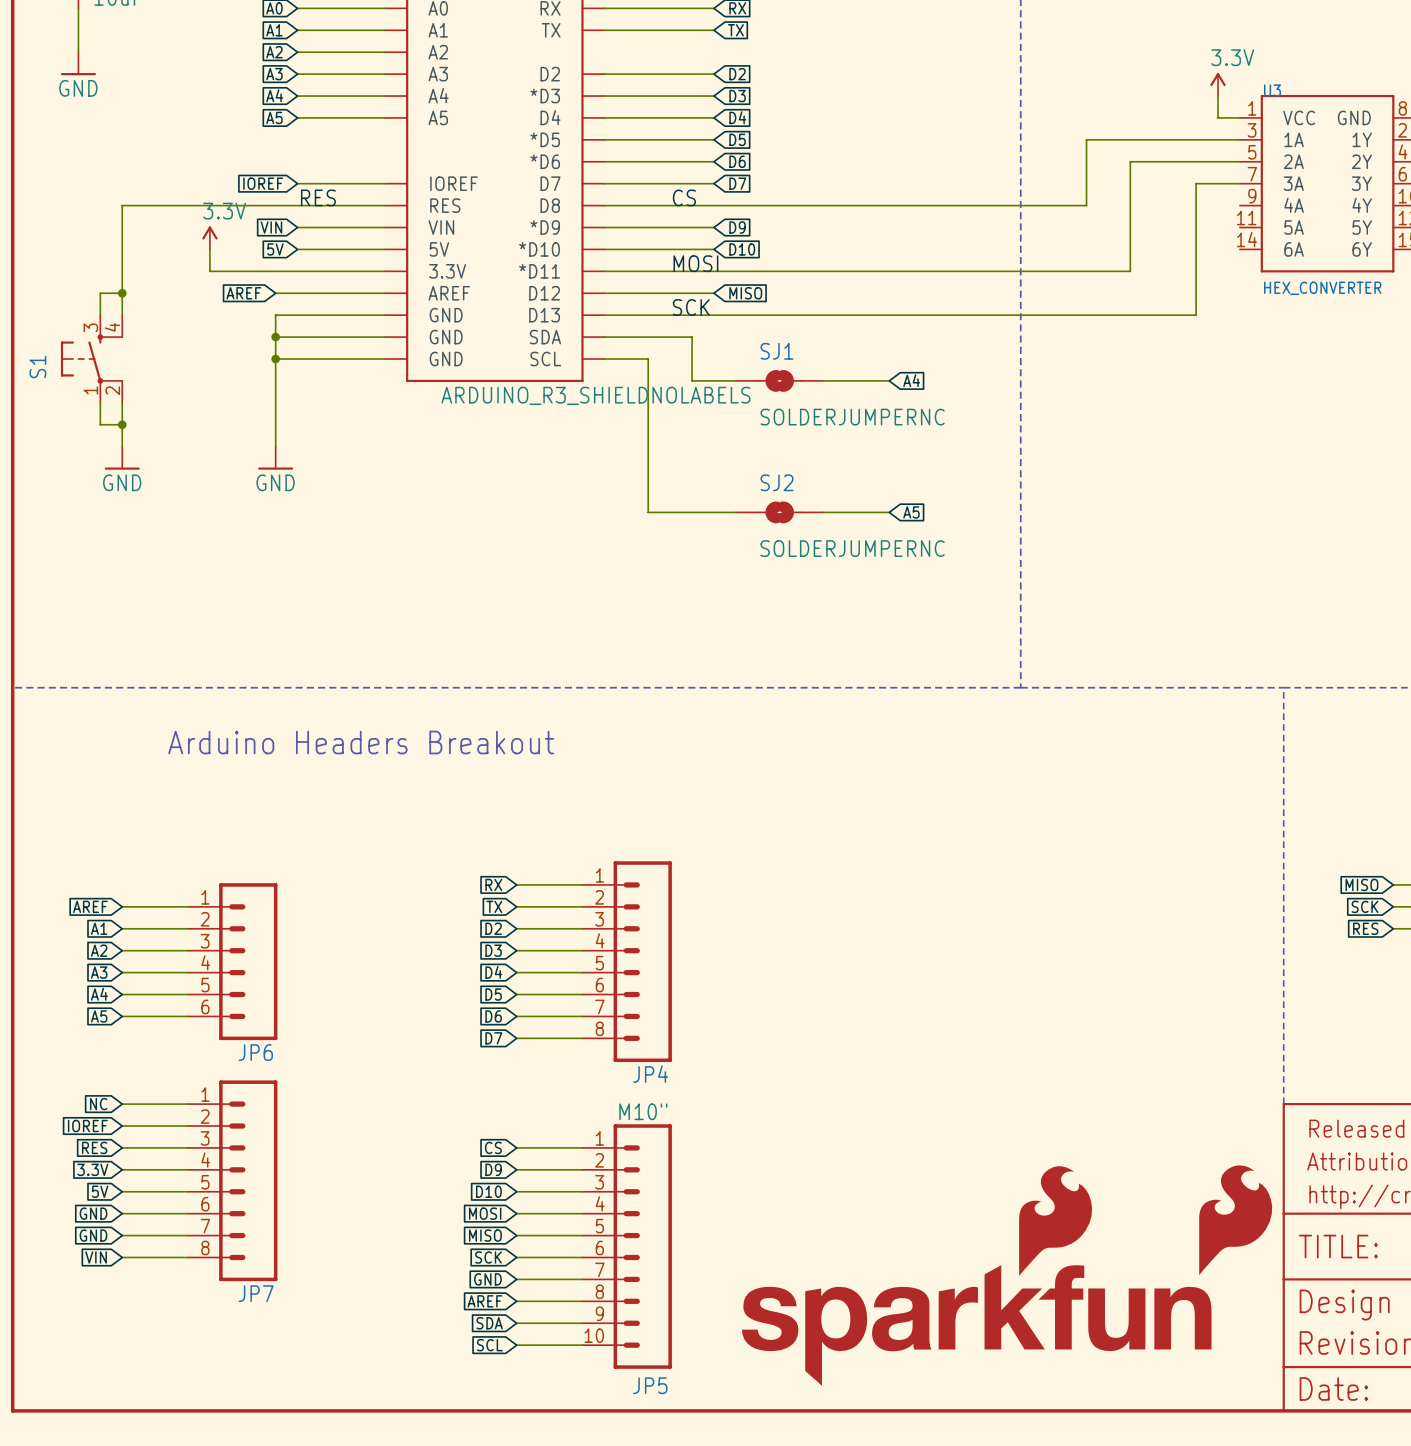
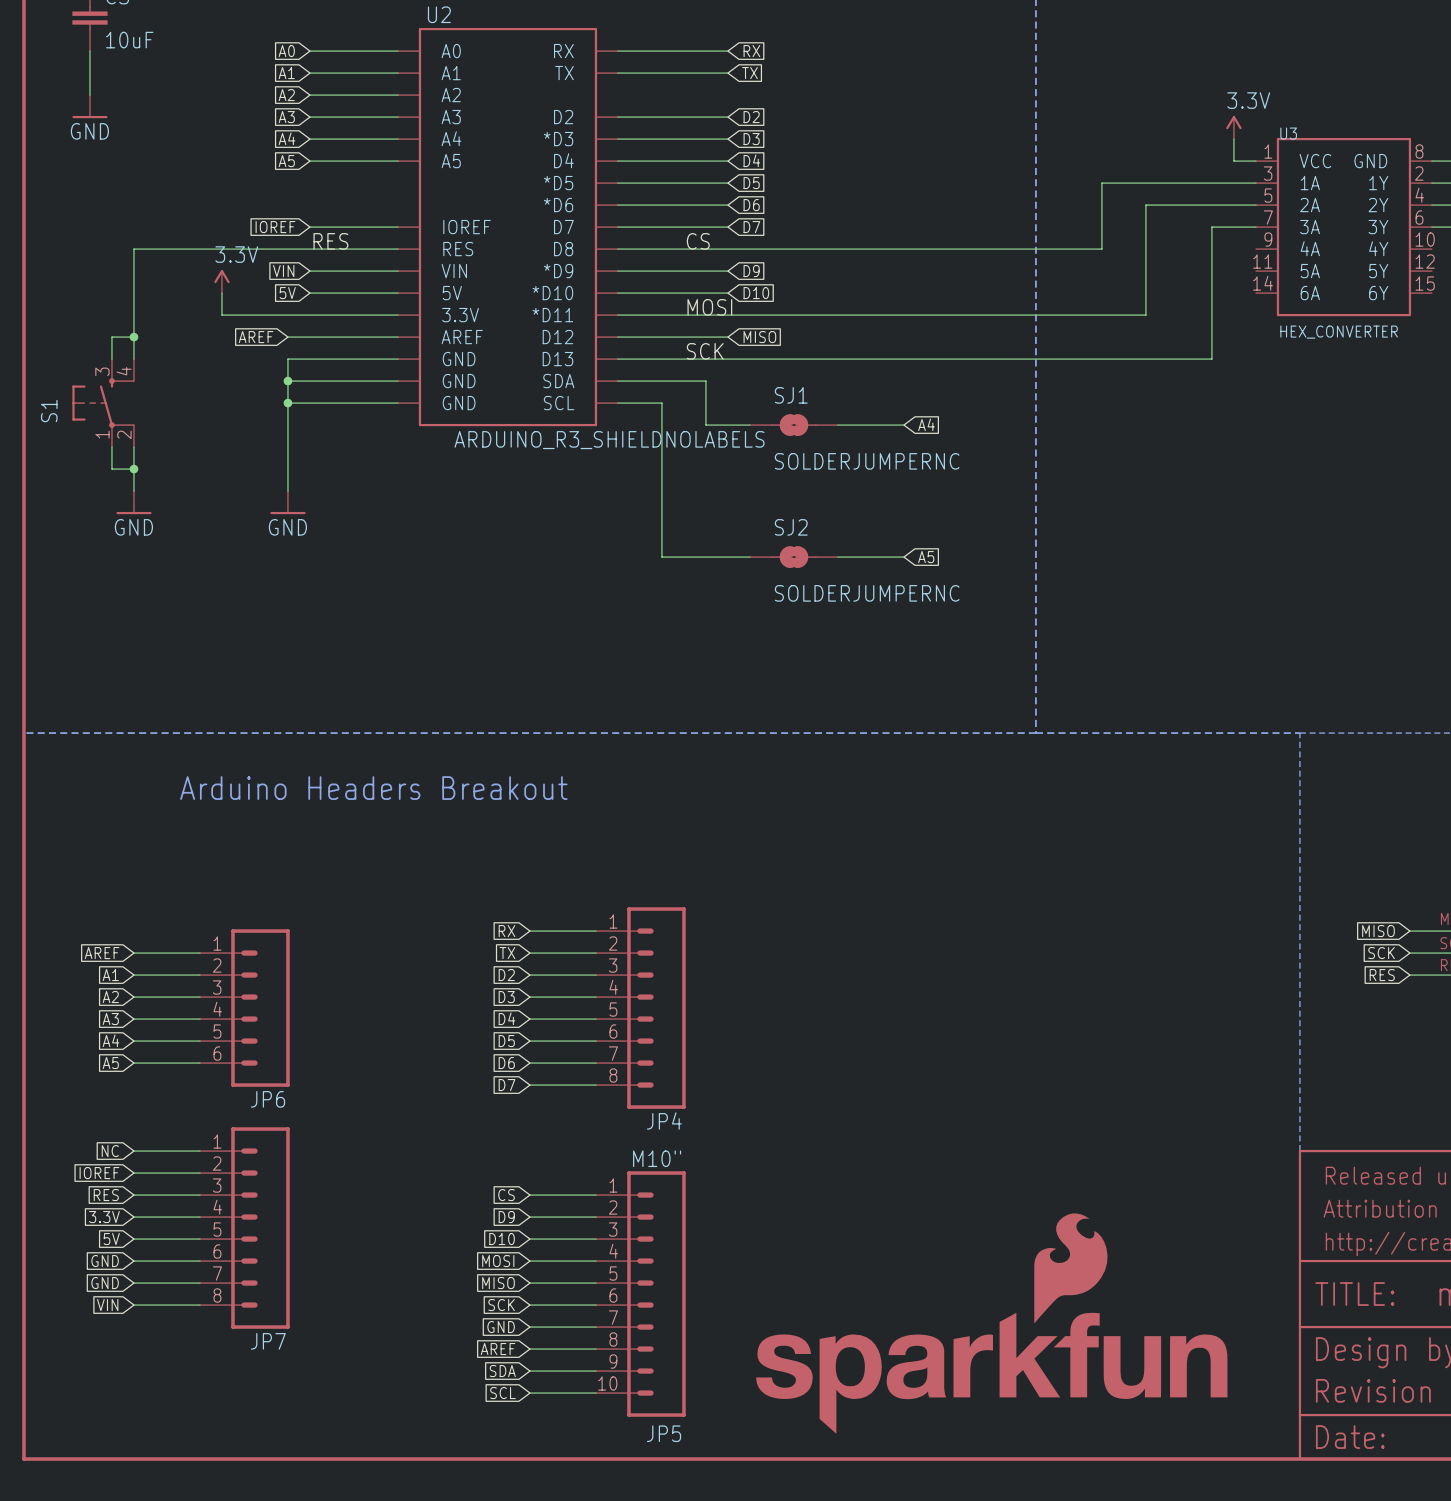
part: (1235, 1220) -> none

